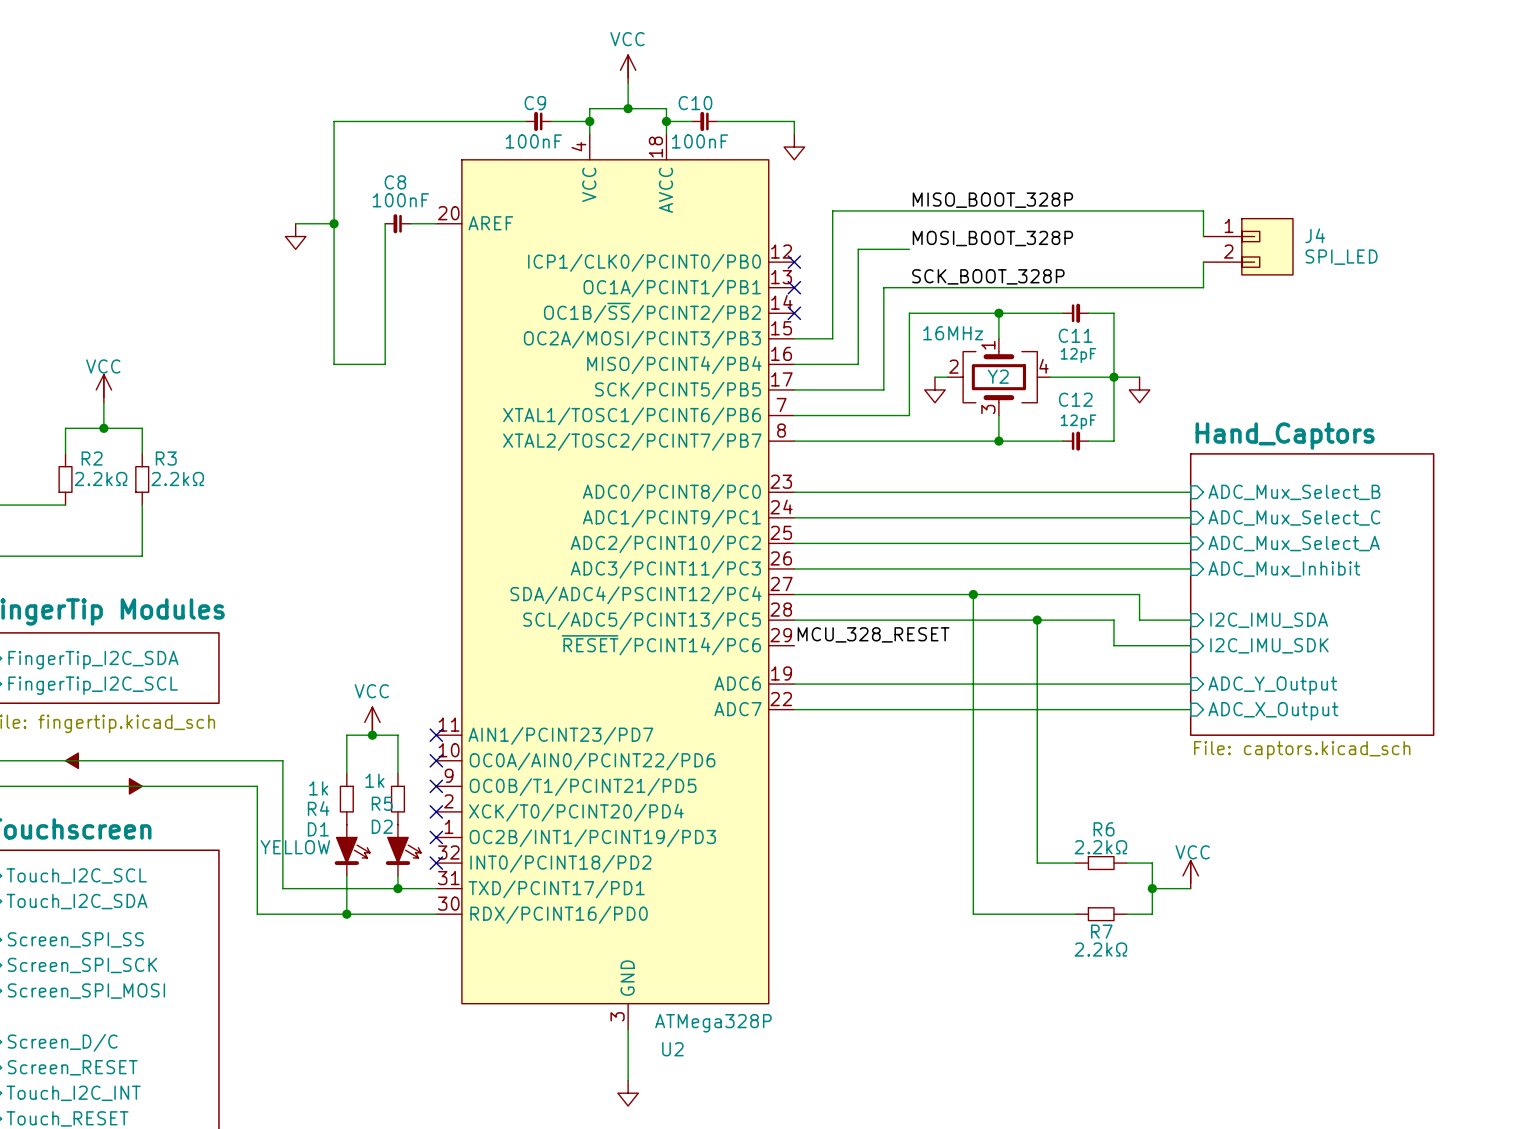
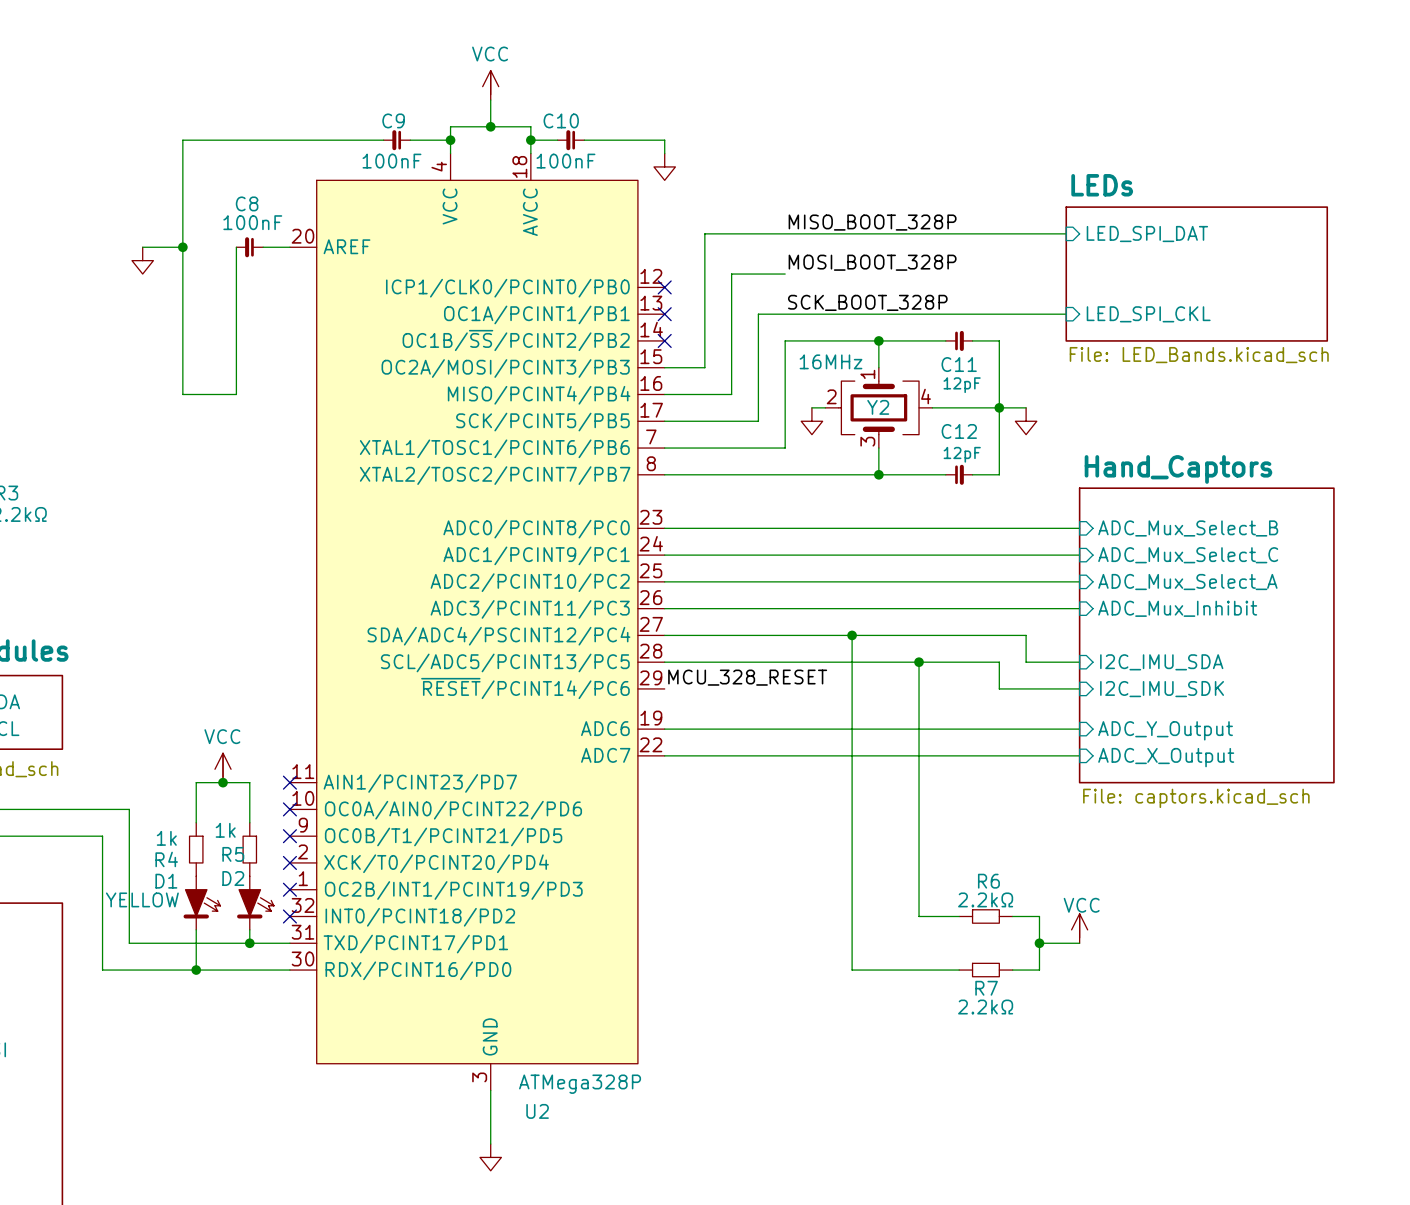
wire: (1177, 210) (1203, 210) (1203, 236) -> none
sheet pin: none -> LED_SPI_DAT (1147, 234)
J4: SPI_LED (1248, 246) -> none
sheet LEDs: none -> File: LED_Bands.kicad_sch (1196, 274)
wire: (1203, 262) (1203, 287) (1177, 287) -> none
sheet pin: none -> LED_SPI_CKL (1148, 314)

